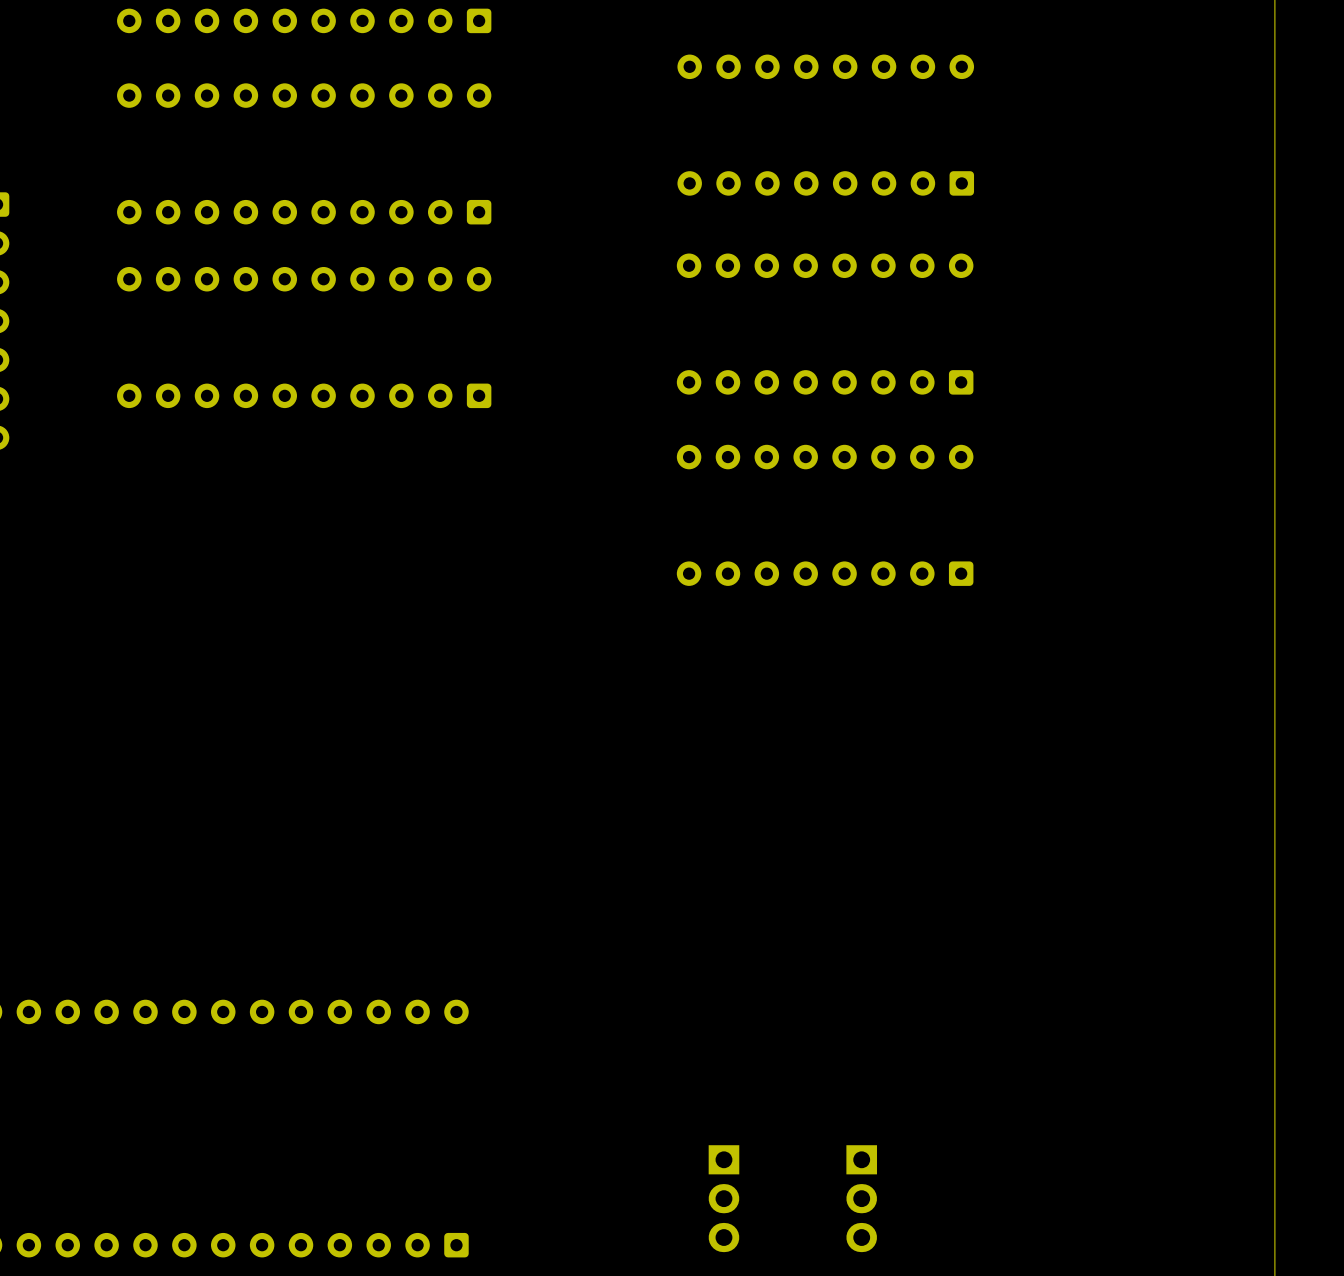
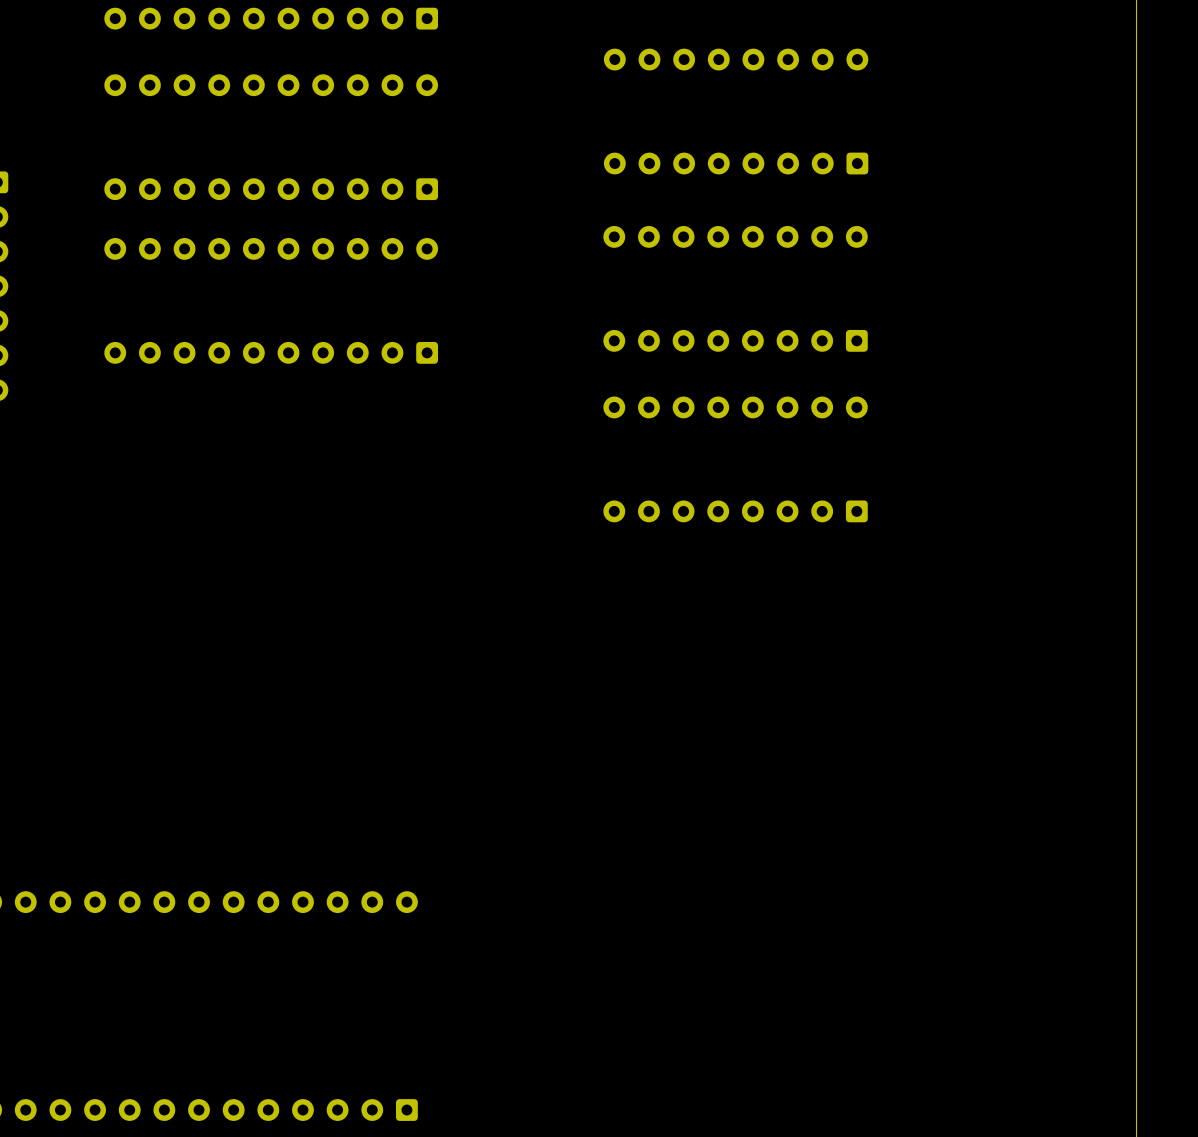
part: (723, 1198) -> none
part: (861, 1198) -> none

